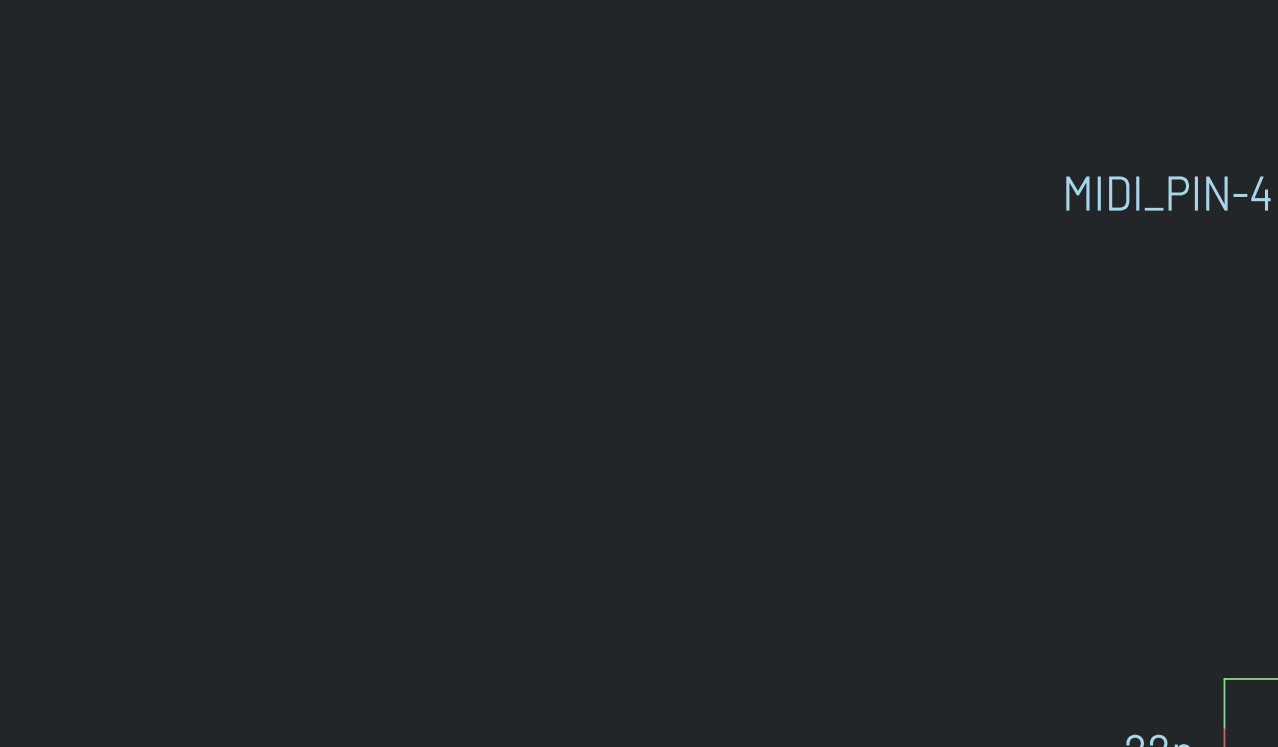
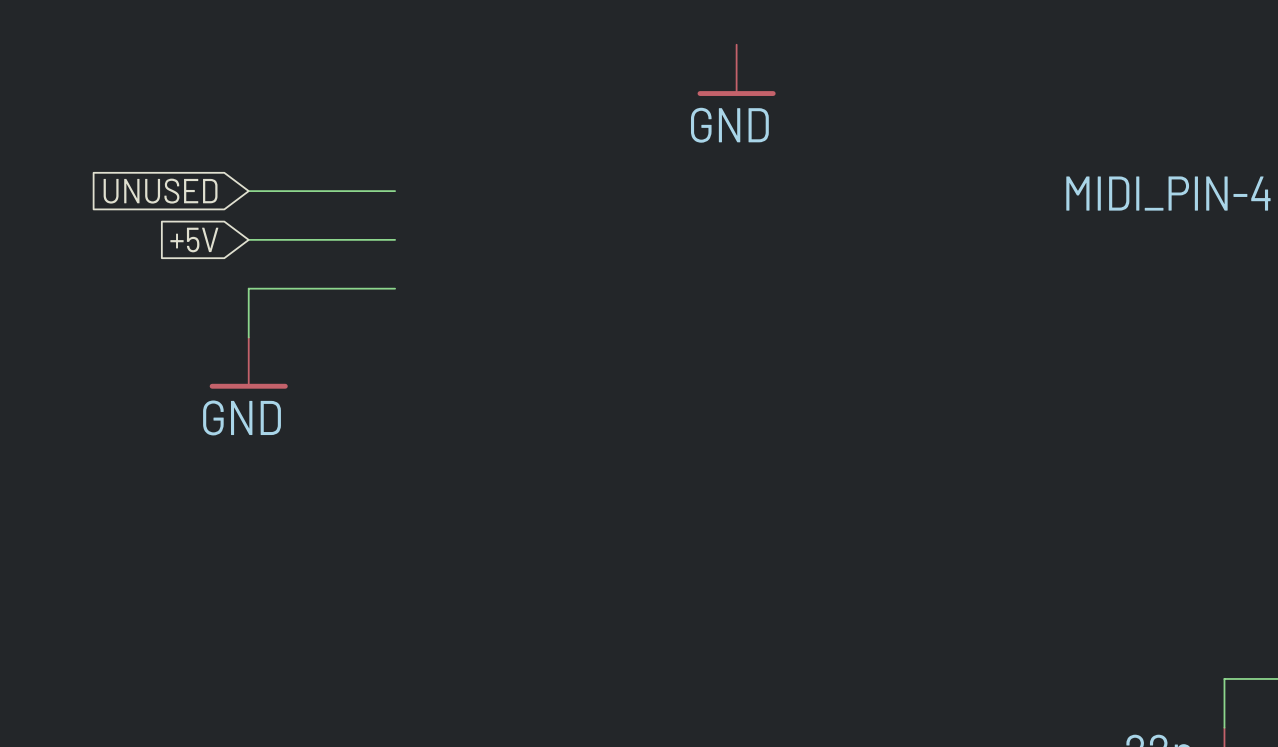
power symbol: none -> GND (736, 70)
global label: none -> UNUSED (160, 191)
wire: none -> (248, 191) (395, 191)
wire: none -> (248, 239) (395, 239)
global label: none -> +5V (194, 240)
wire: none -> (395, 288) (248, 288) (248, 337)
power symbol: none -> GND (248, 363)

